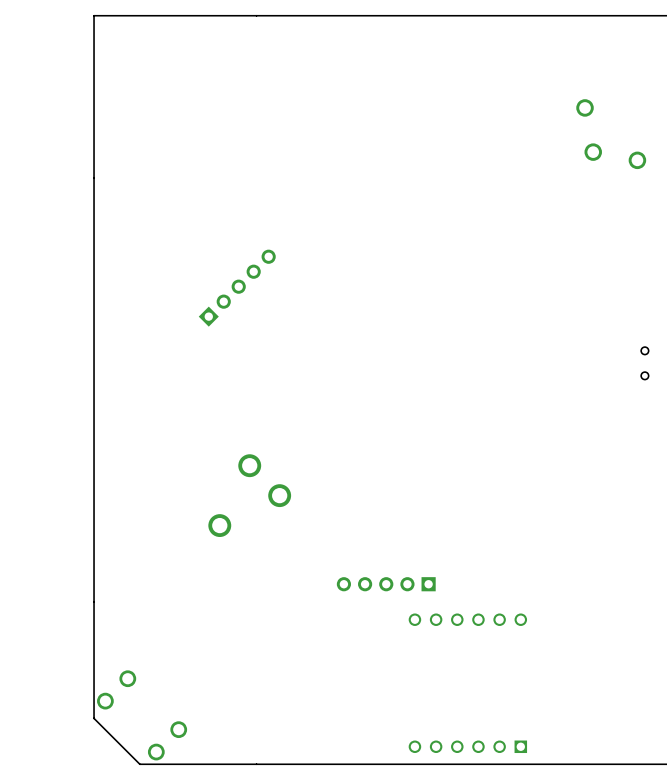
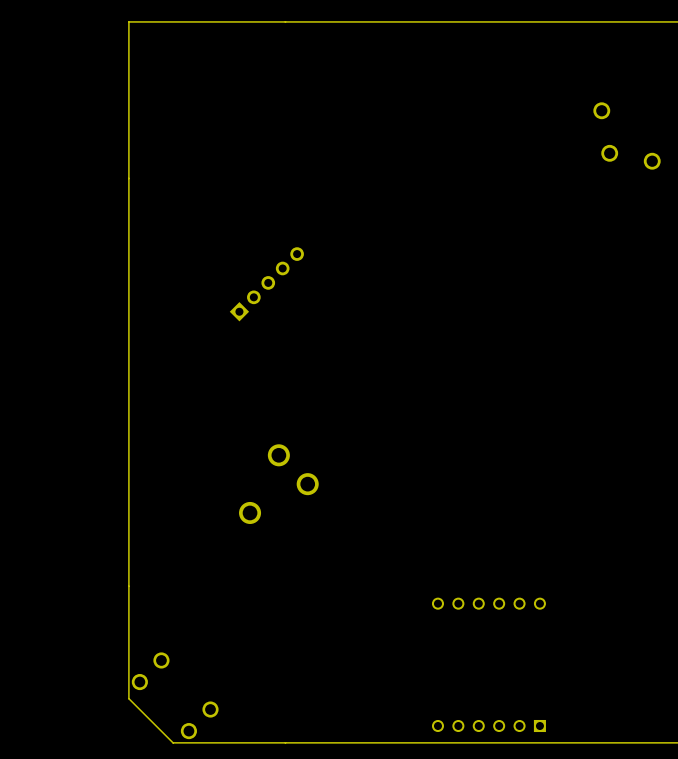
part: (644, 363) -> none
part: (386, 584) -> none

